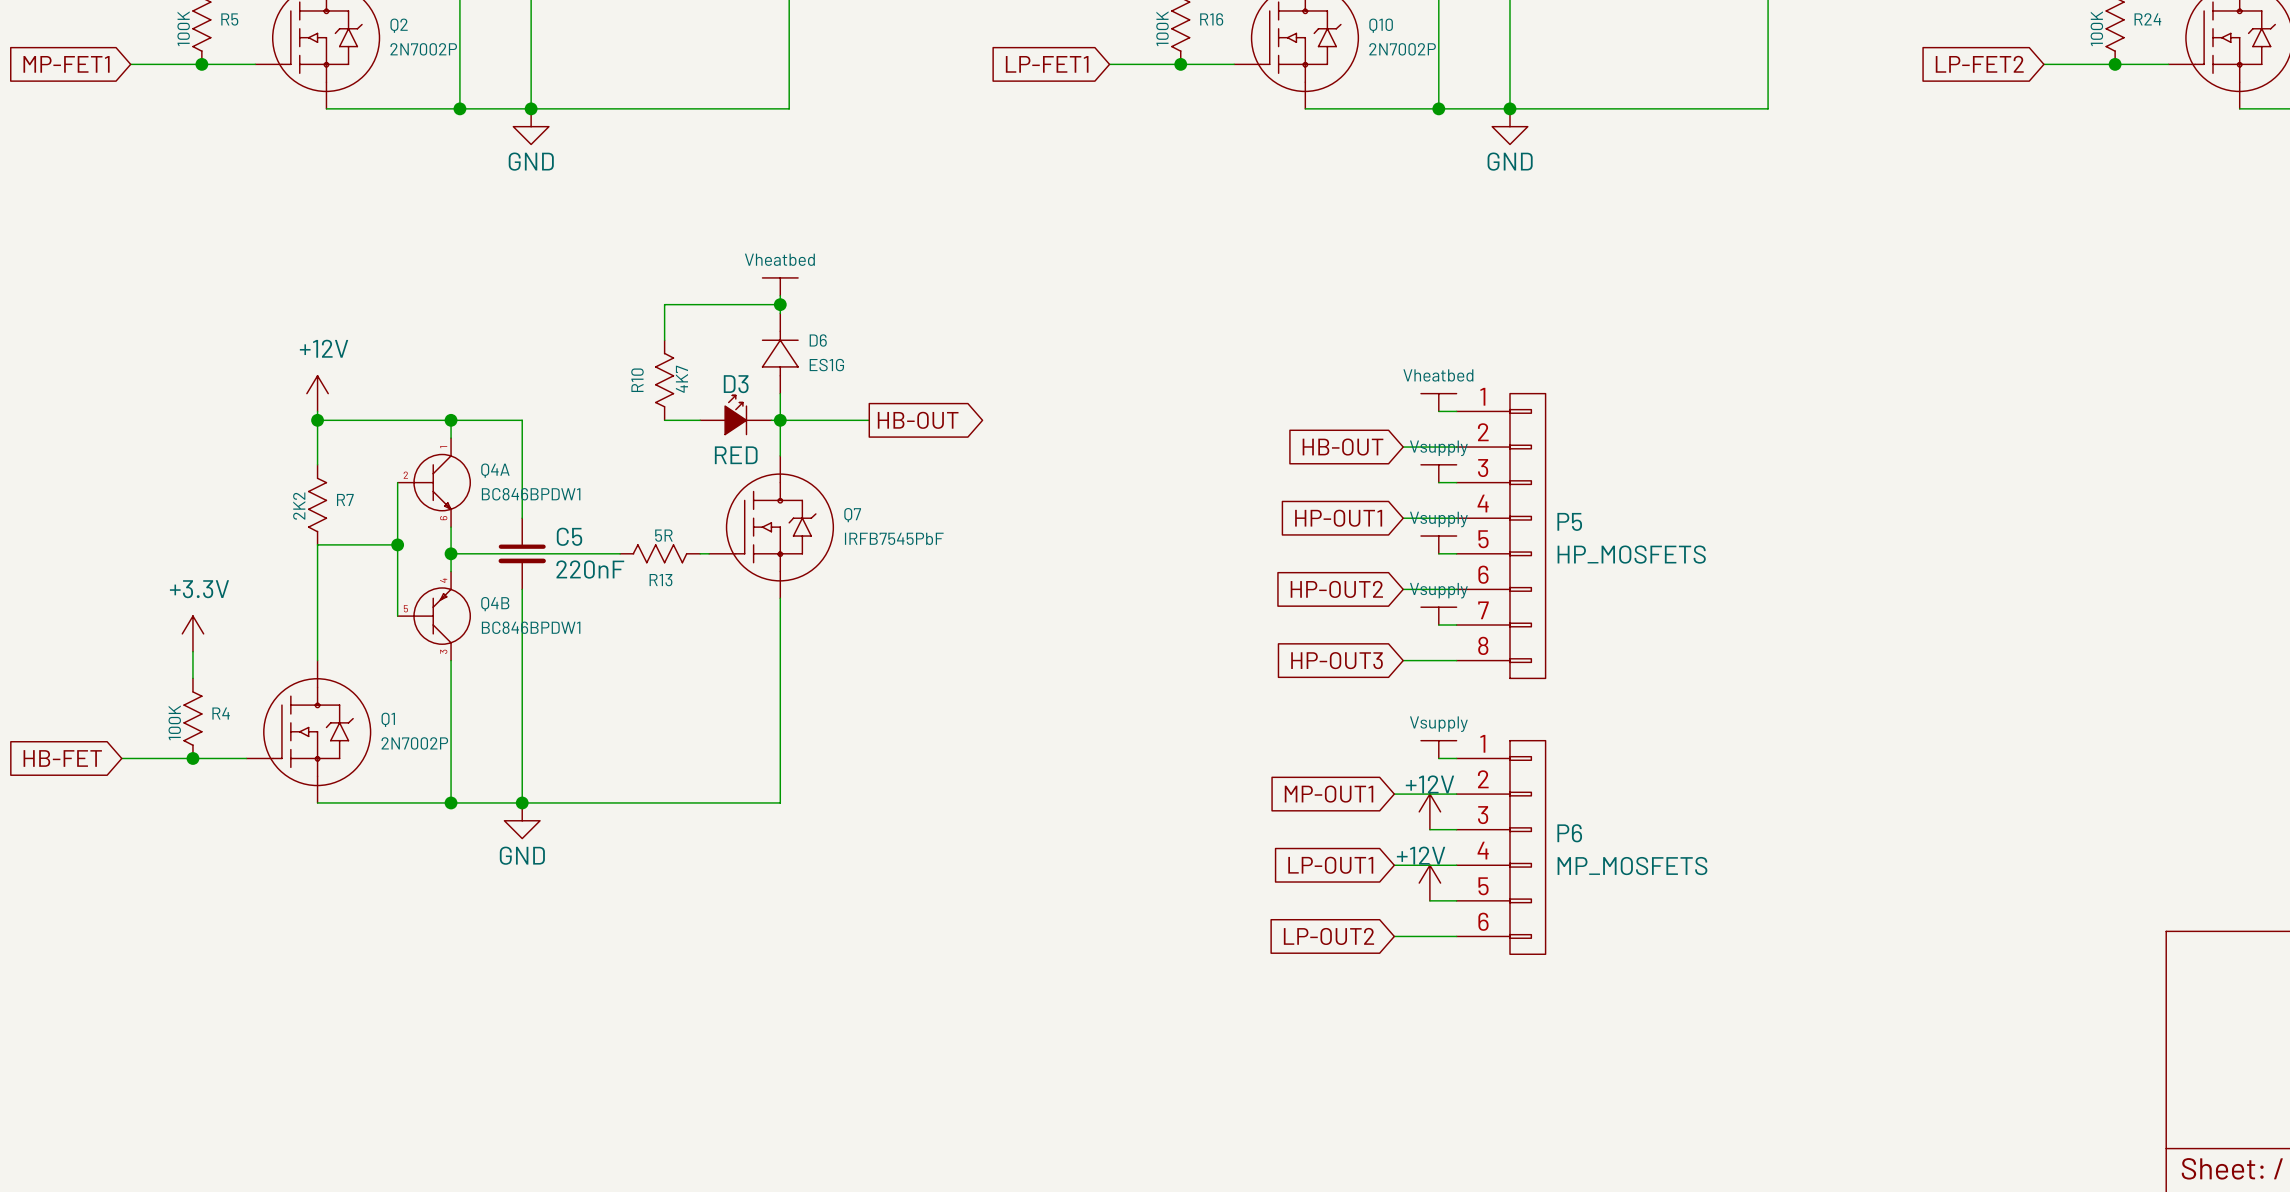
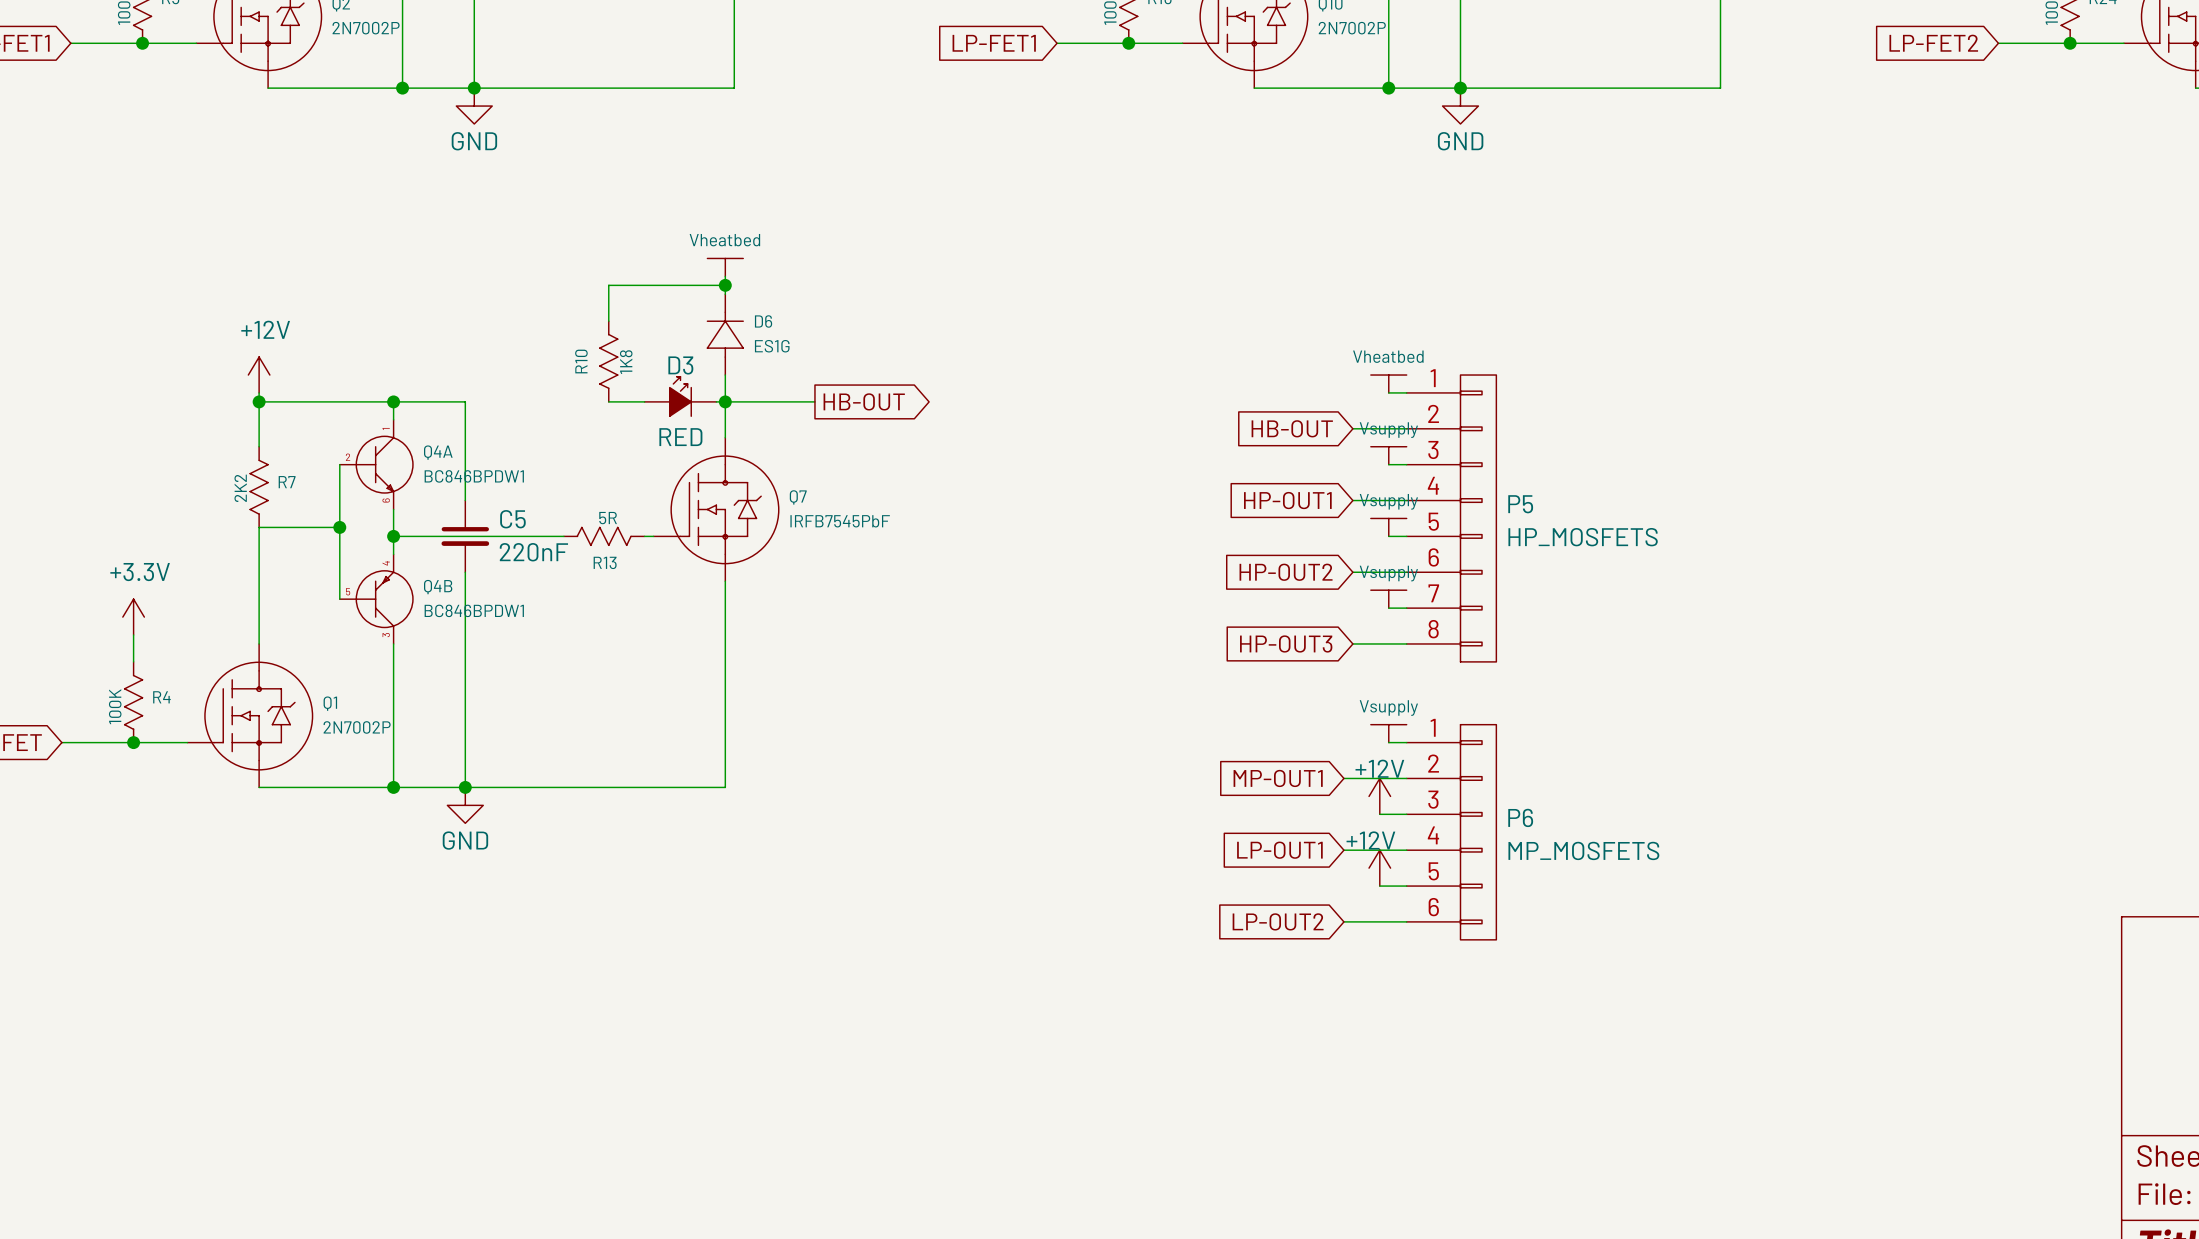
R10 value: 4K7 (681, 379) -> 1K8 (626, 362)

